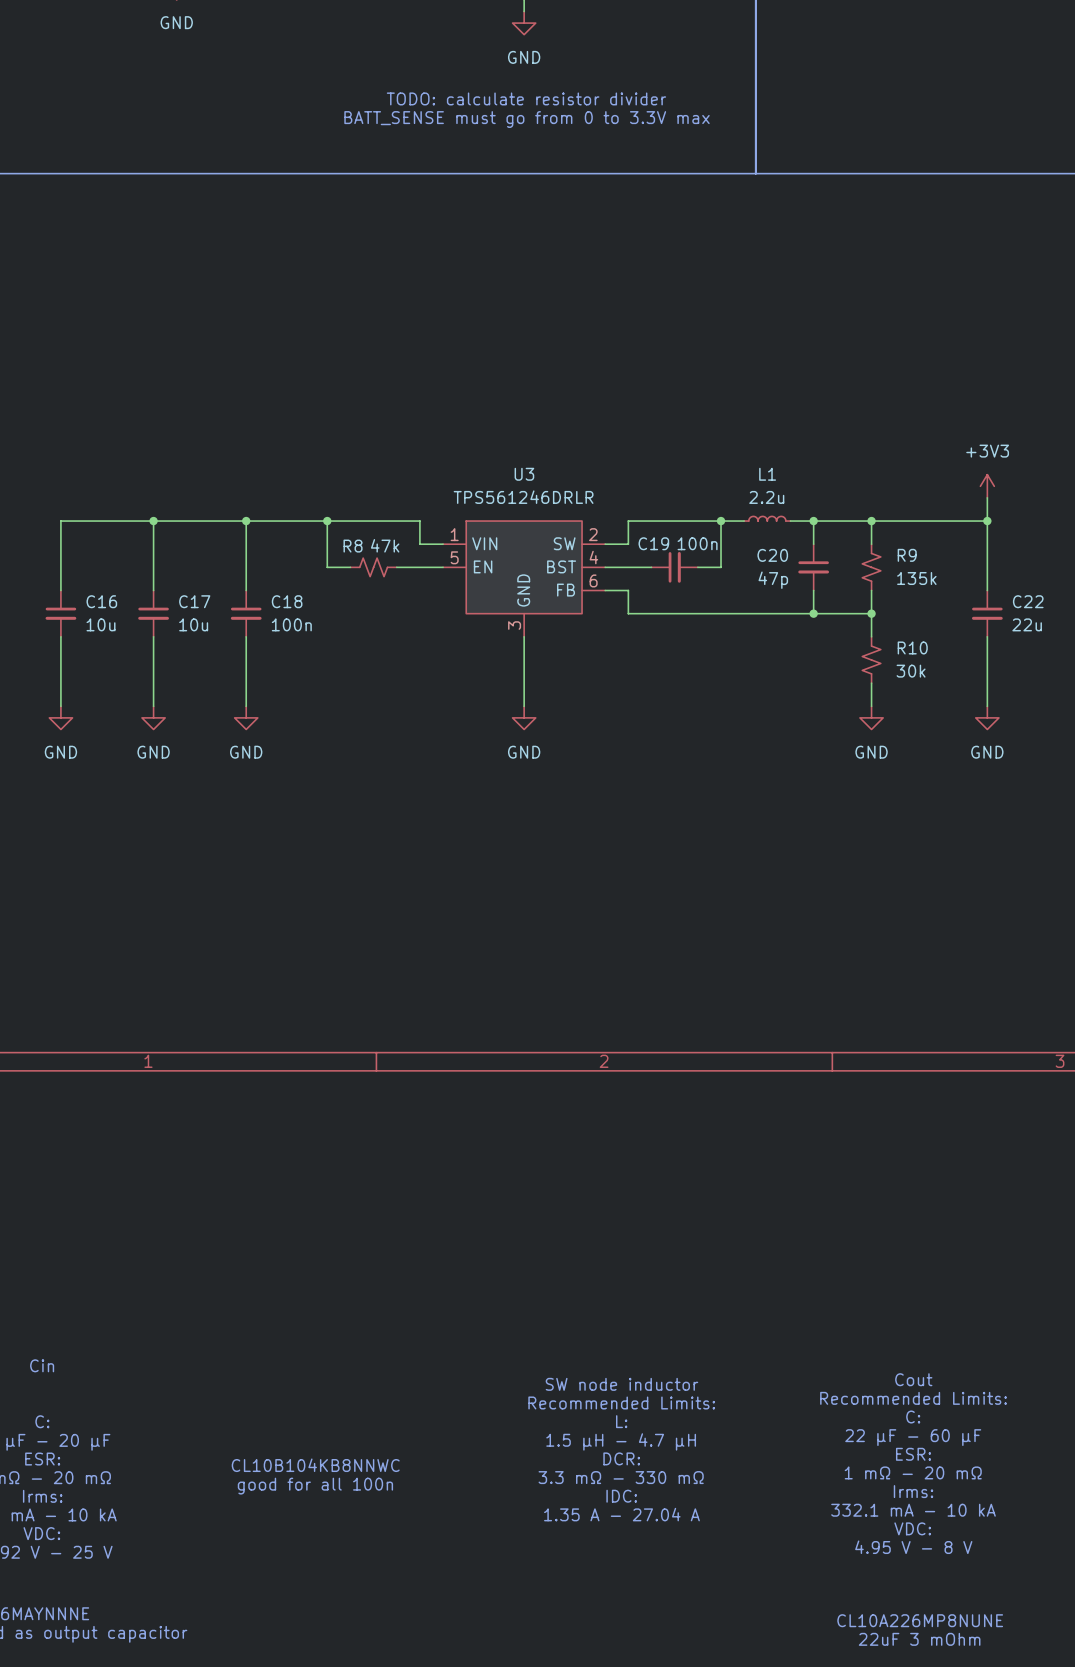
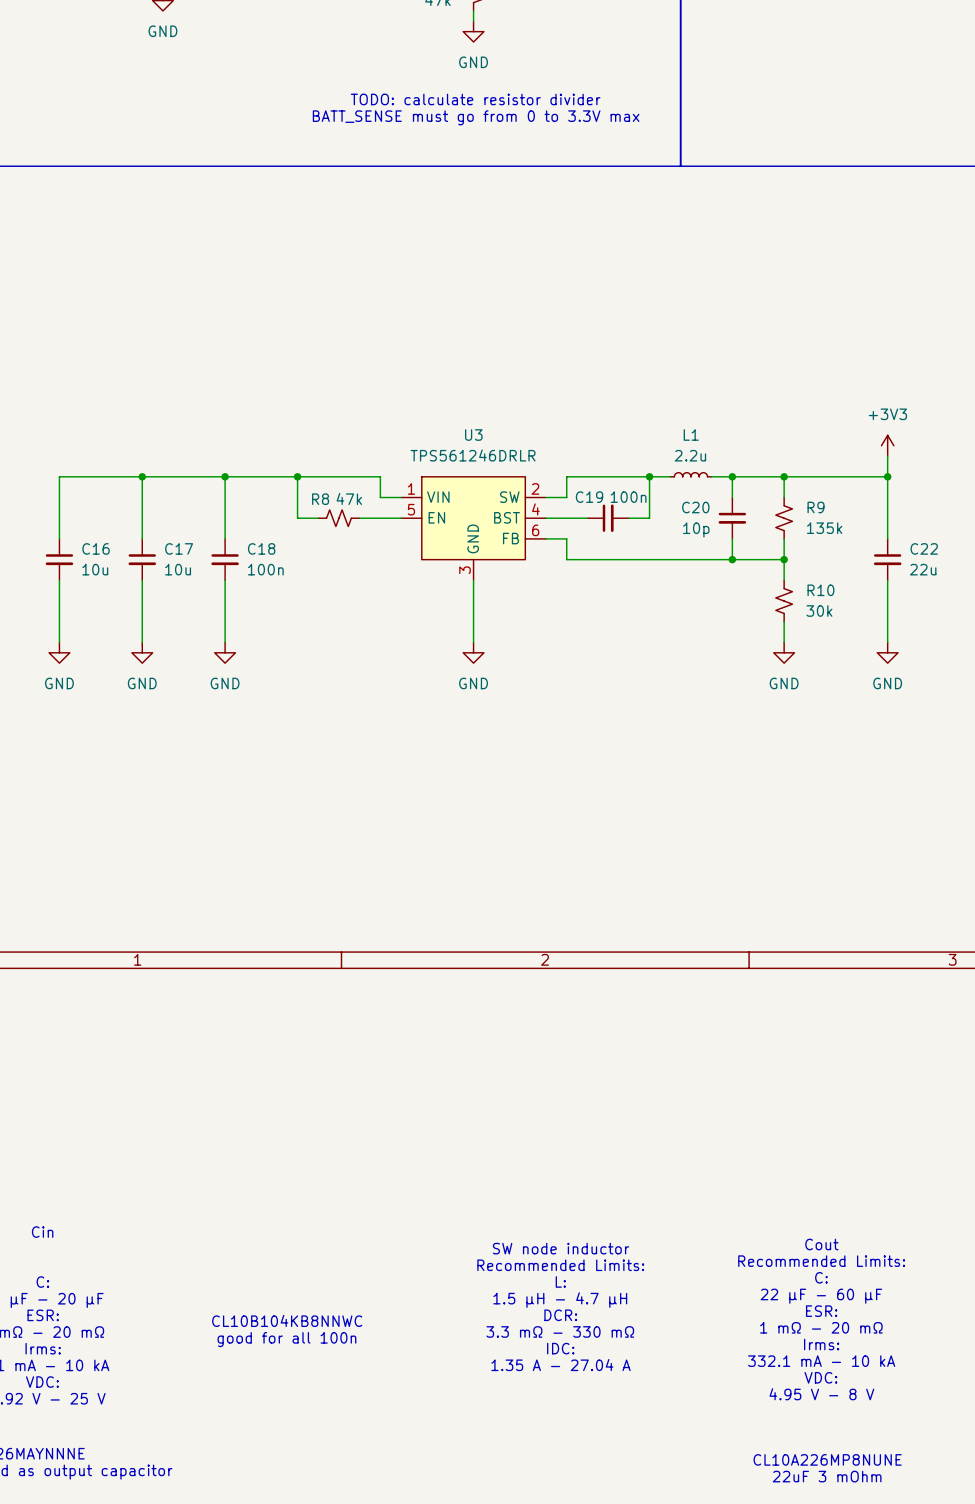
C20 value: 47p (773, 580) -> 10p (696, 529)

